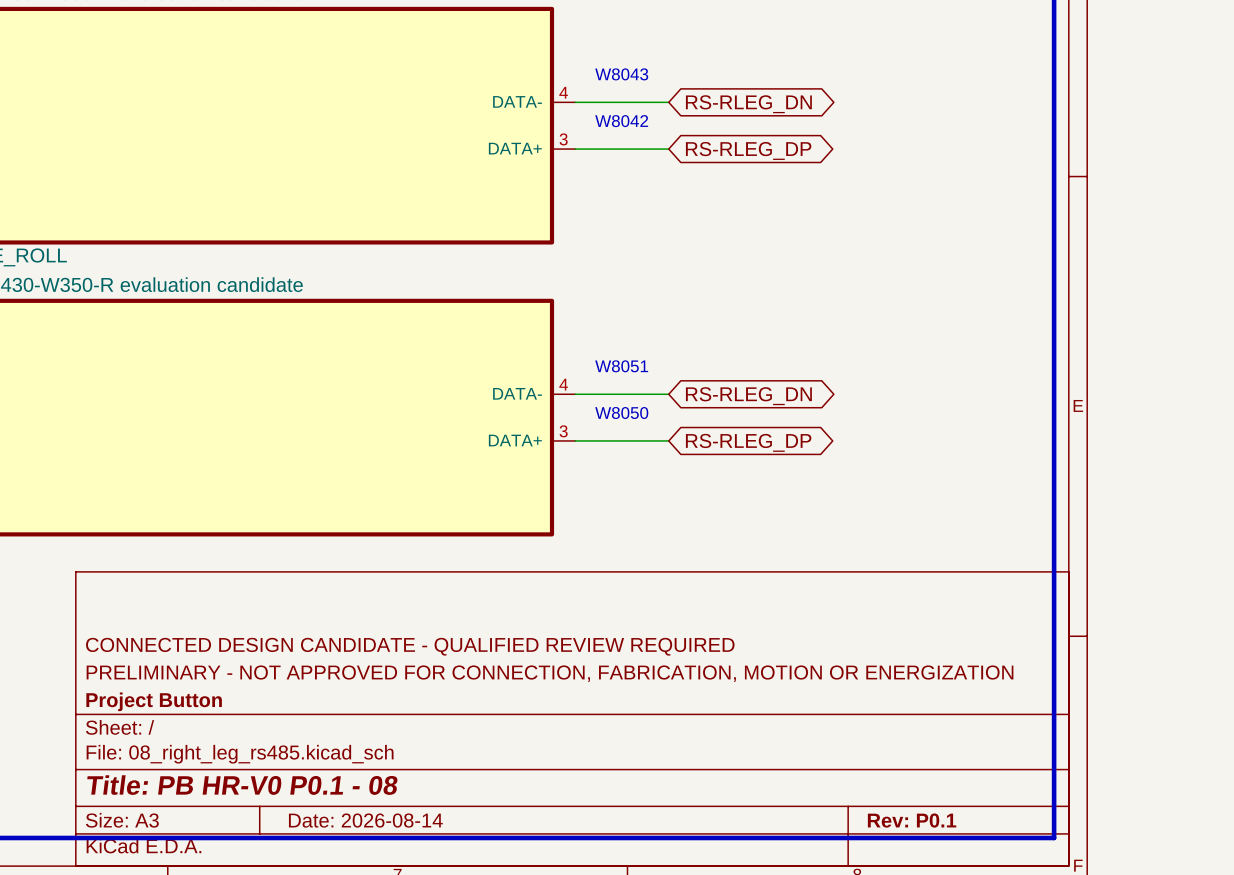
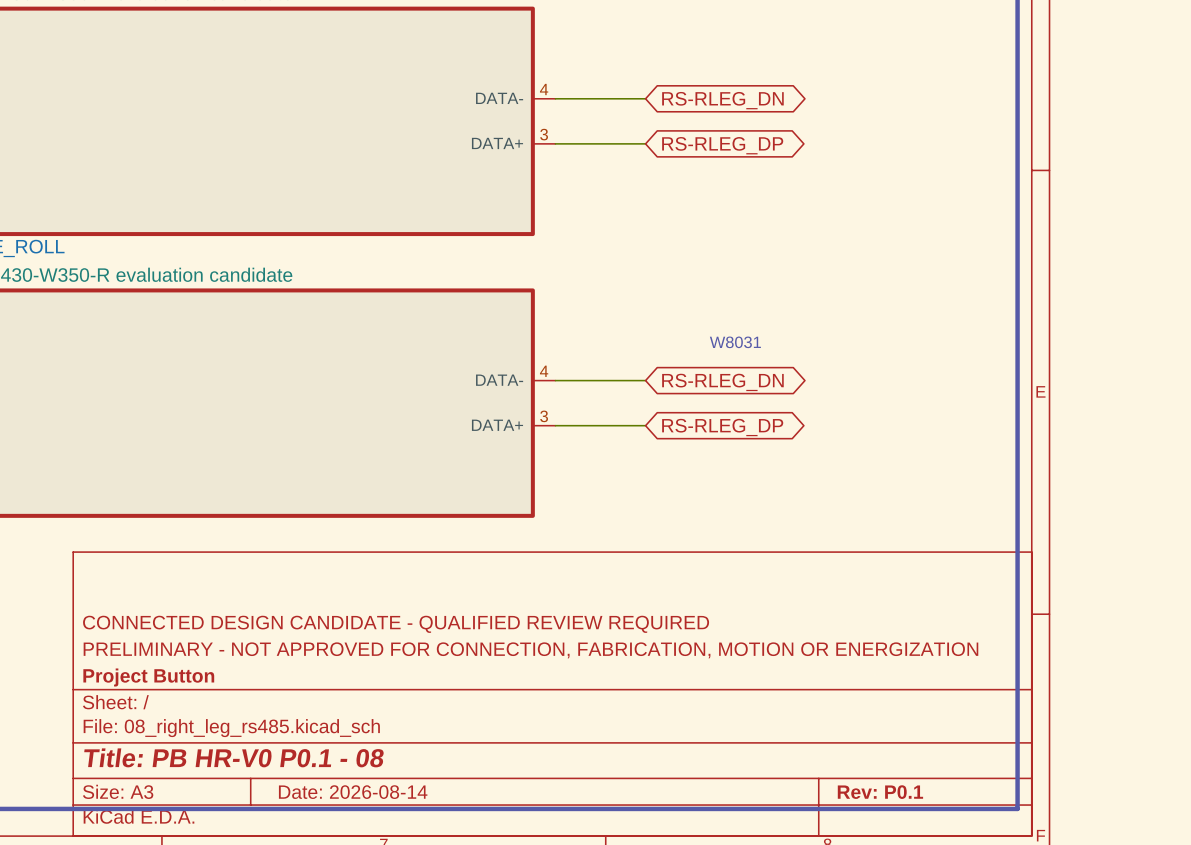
text: W8043 (621, 74) -> none
text: W8042 (621, 121) -> none
text: none -> W8031 (735, 342)
text: W8051 (621, 366) -> none
text: W8050 (621, 413) -> none

